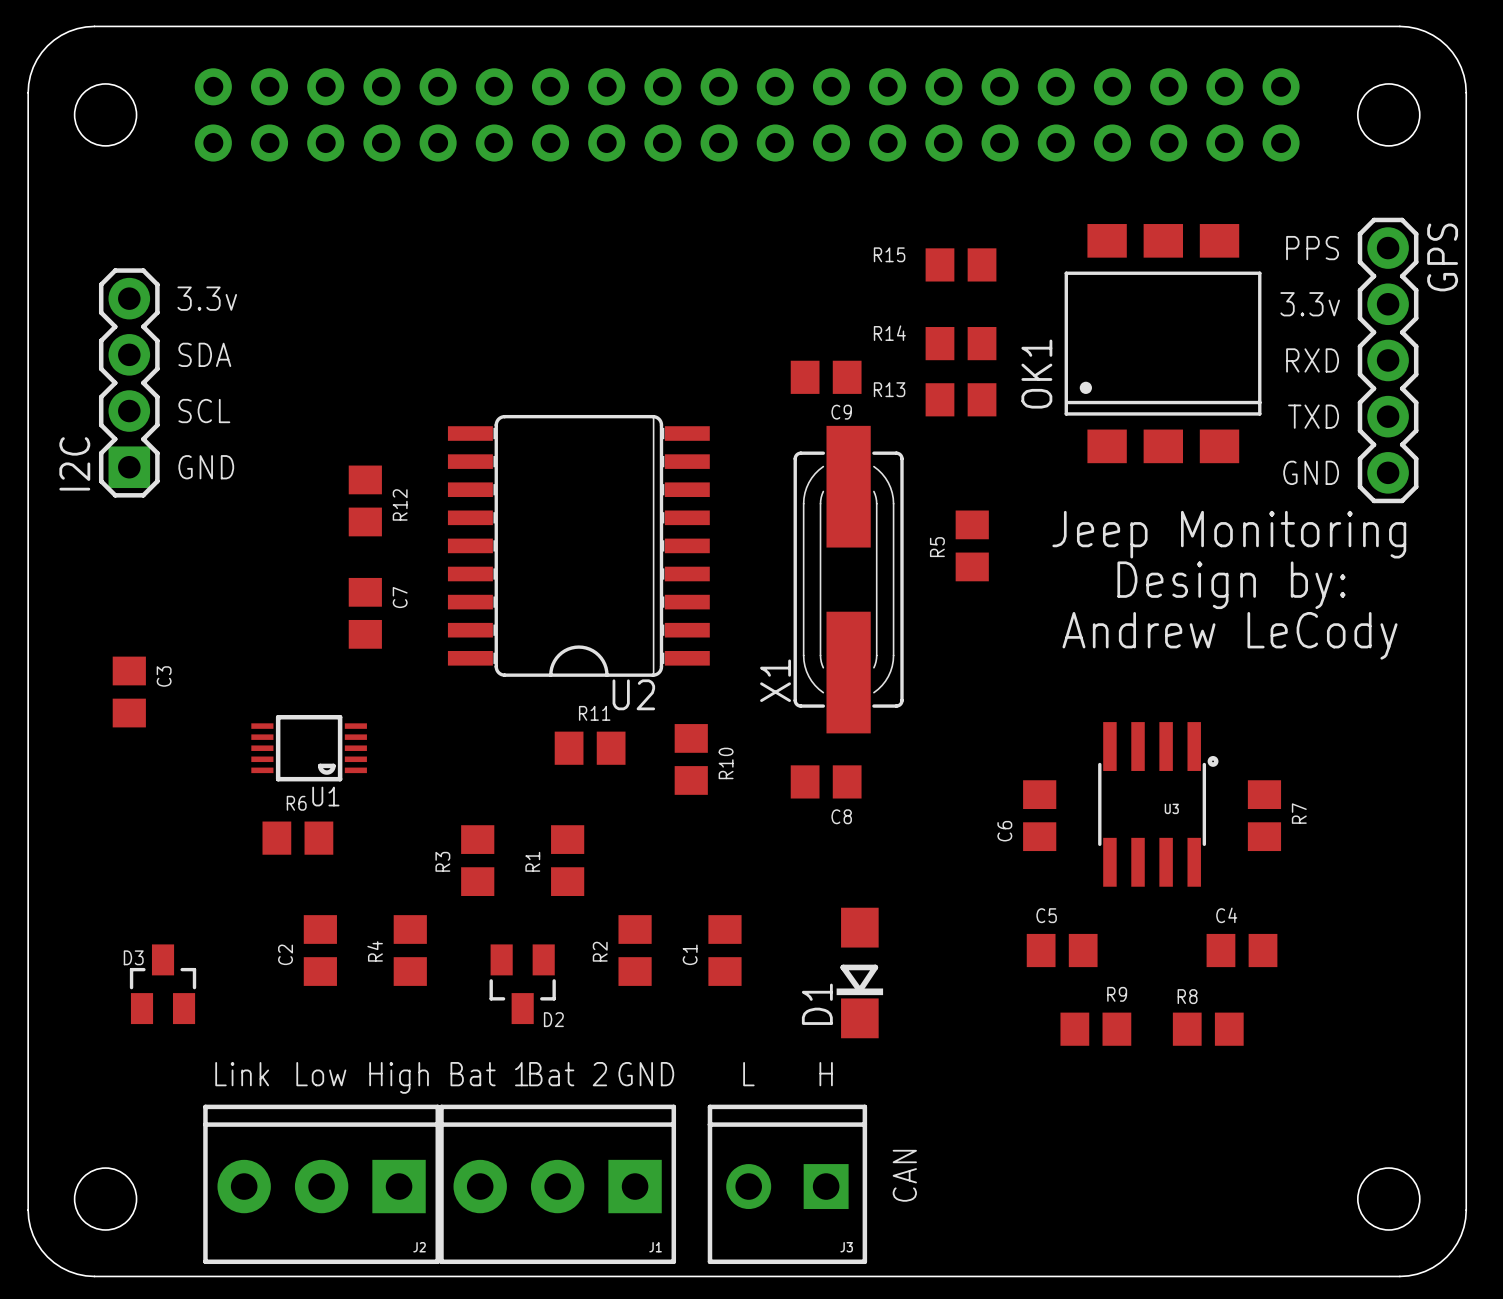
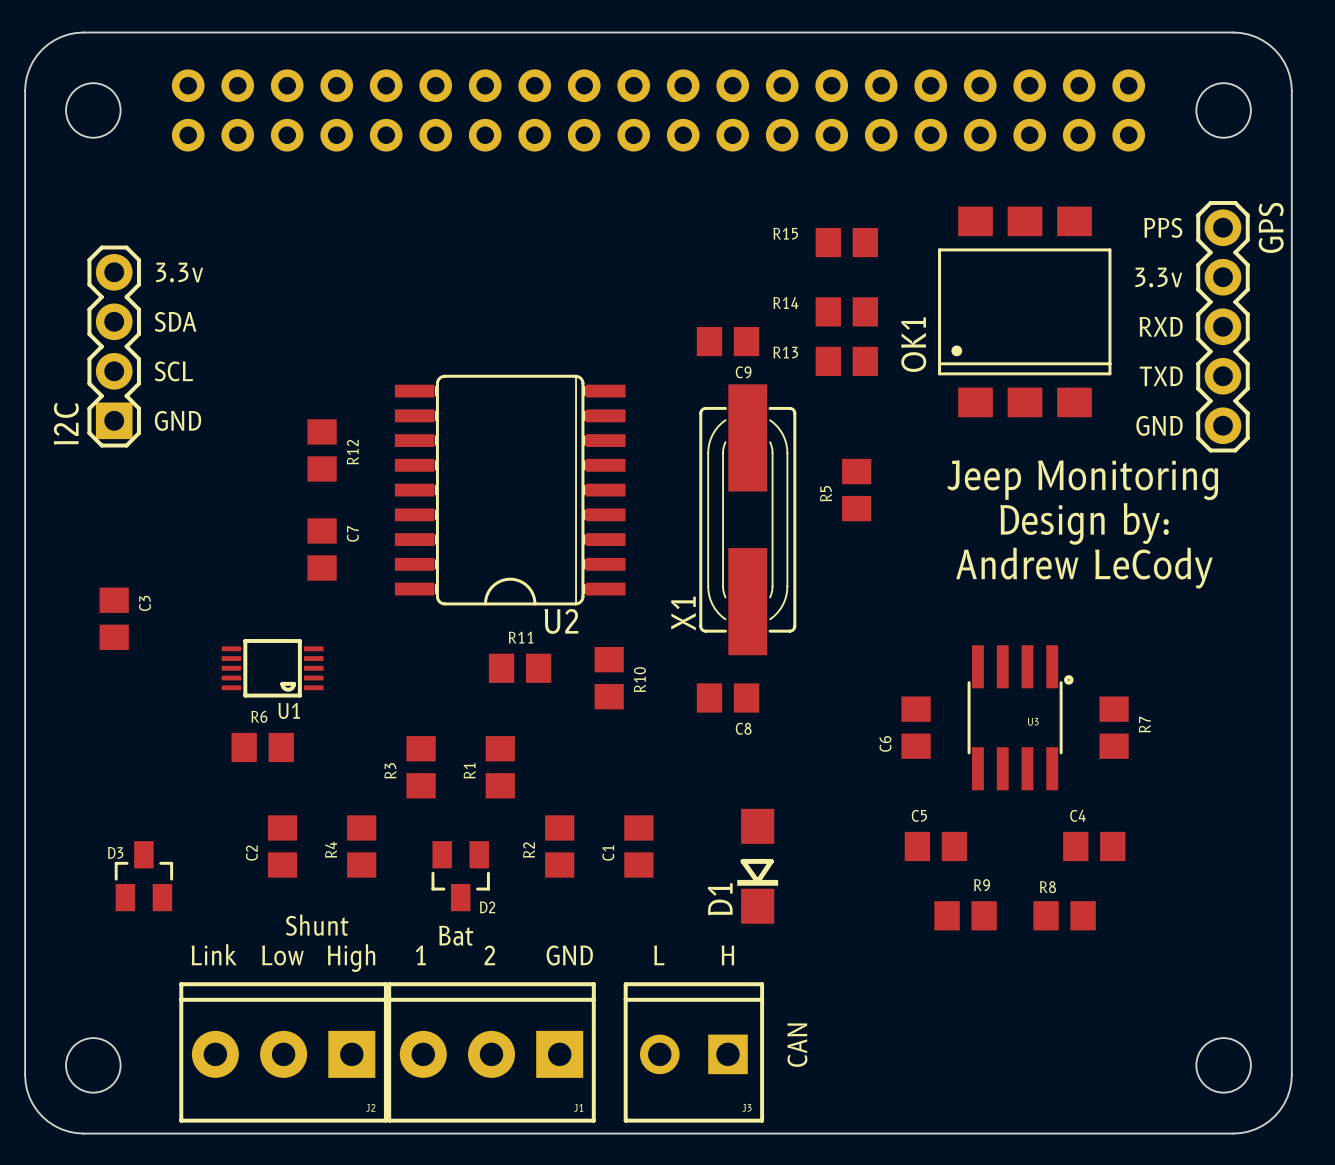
text: none -> Shunt (317, 925)
text: none -> Bat (456, 935)
text: Bat 1 (489, 1074) -> 1 (420, 955)
text: Bat 2 (568, 1074) -> 2 (489, 955)

